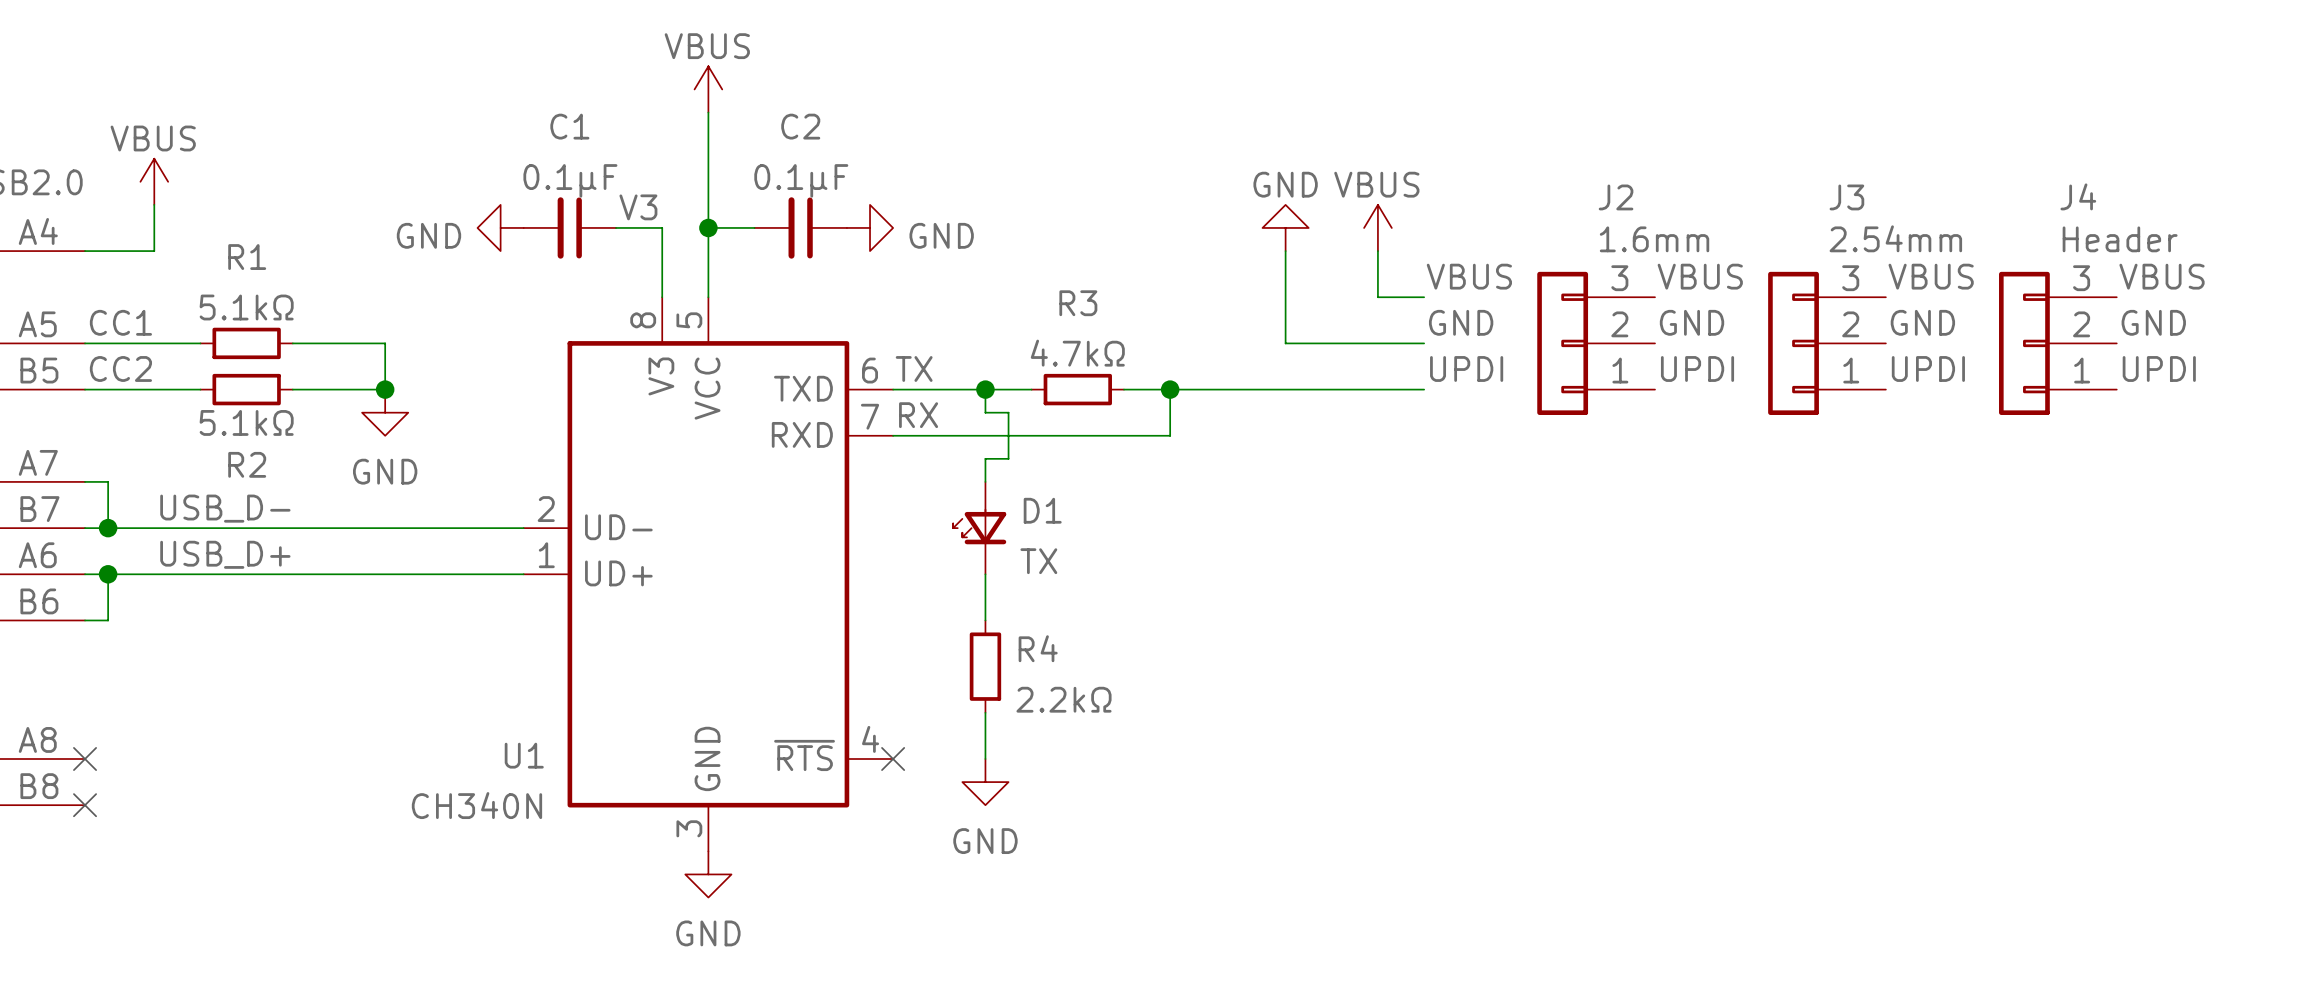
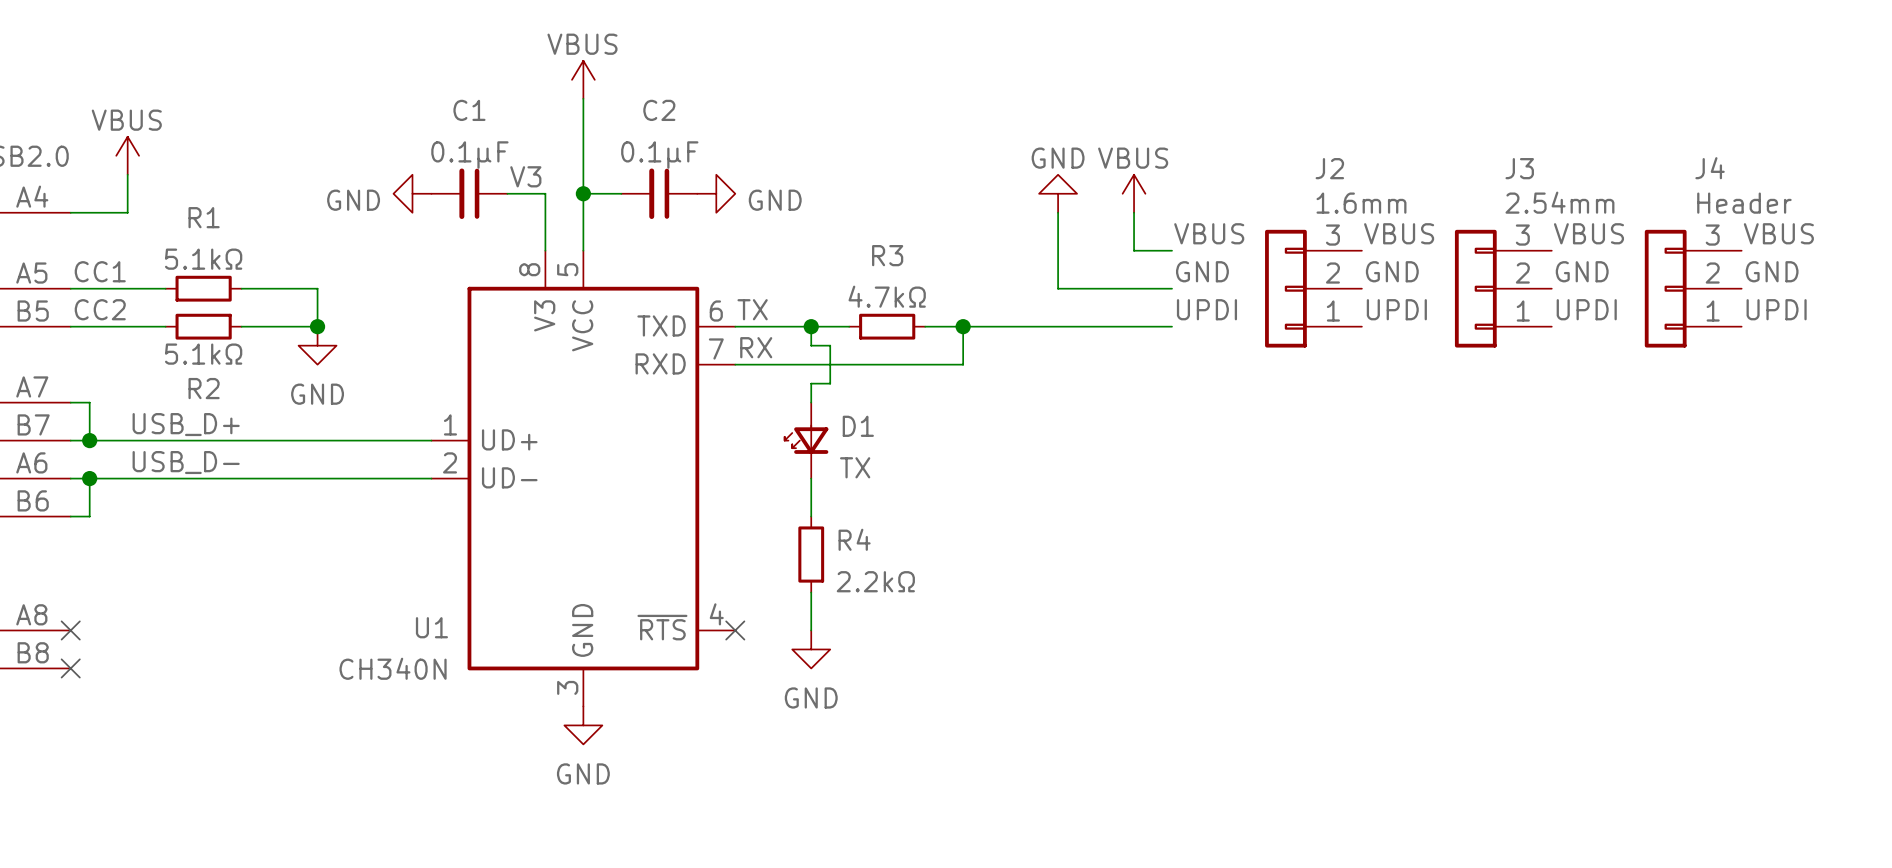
label: USB_D- (225, 508) -> USB_D+ (186, 424)
U1 pin number: 2 (546, 509) -> 1 (450, 424)
U1 pin name: UD- (618, 527) -> UD+ (509, 439)
label: USB_D+ (225, 554) -> USB_D- (186, 462)
U1 pin number: 1 (546, 555) -> 2 (450, 462)
U1 pin name: UD+ (618, 573) -> UD- (509, 477)

